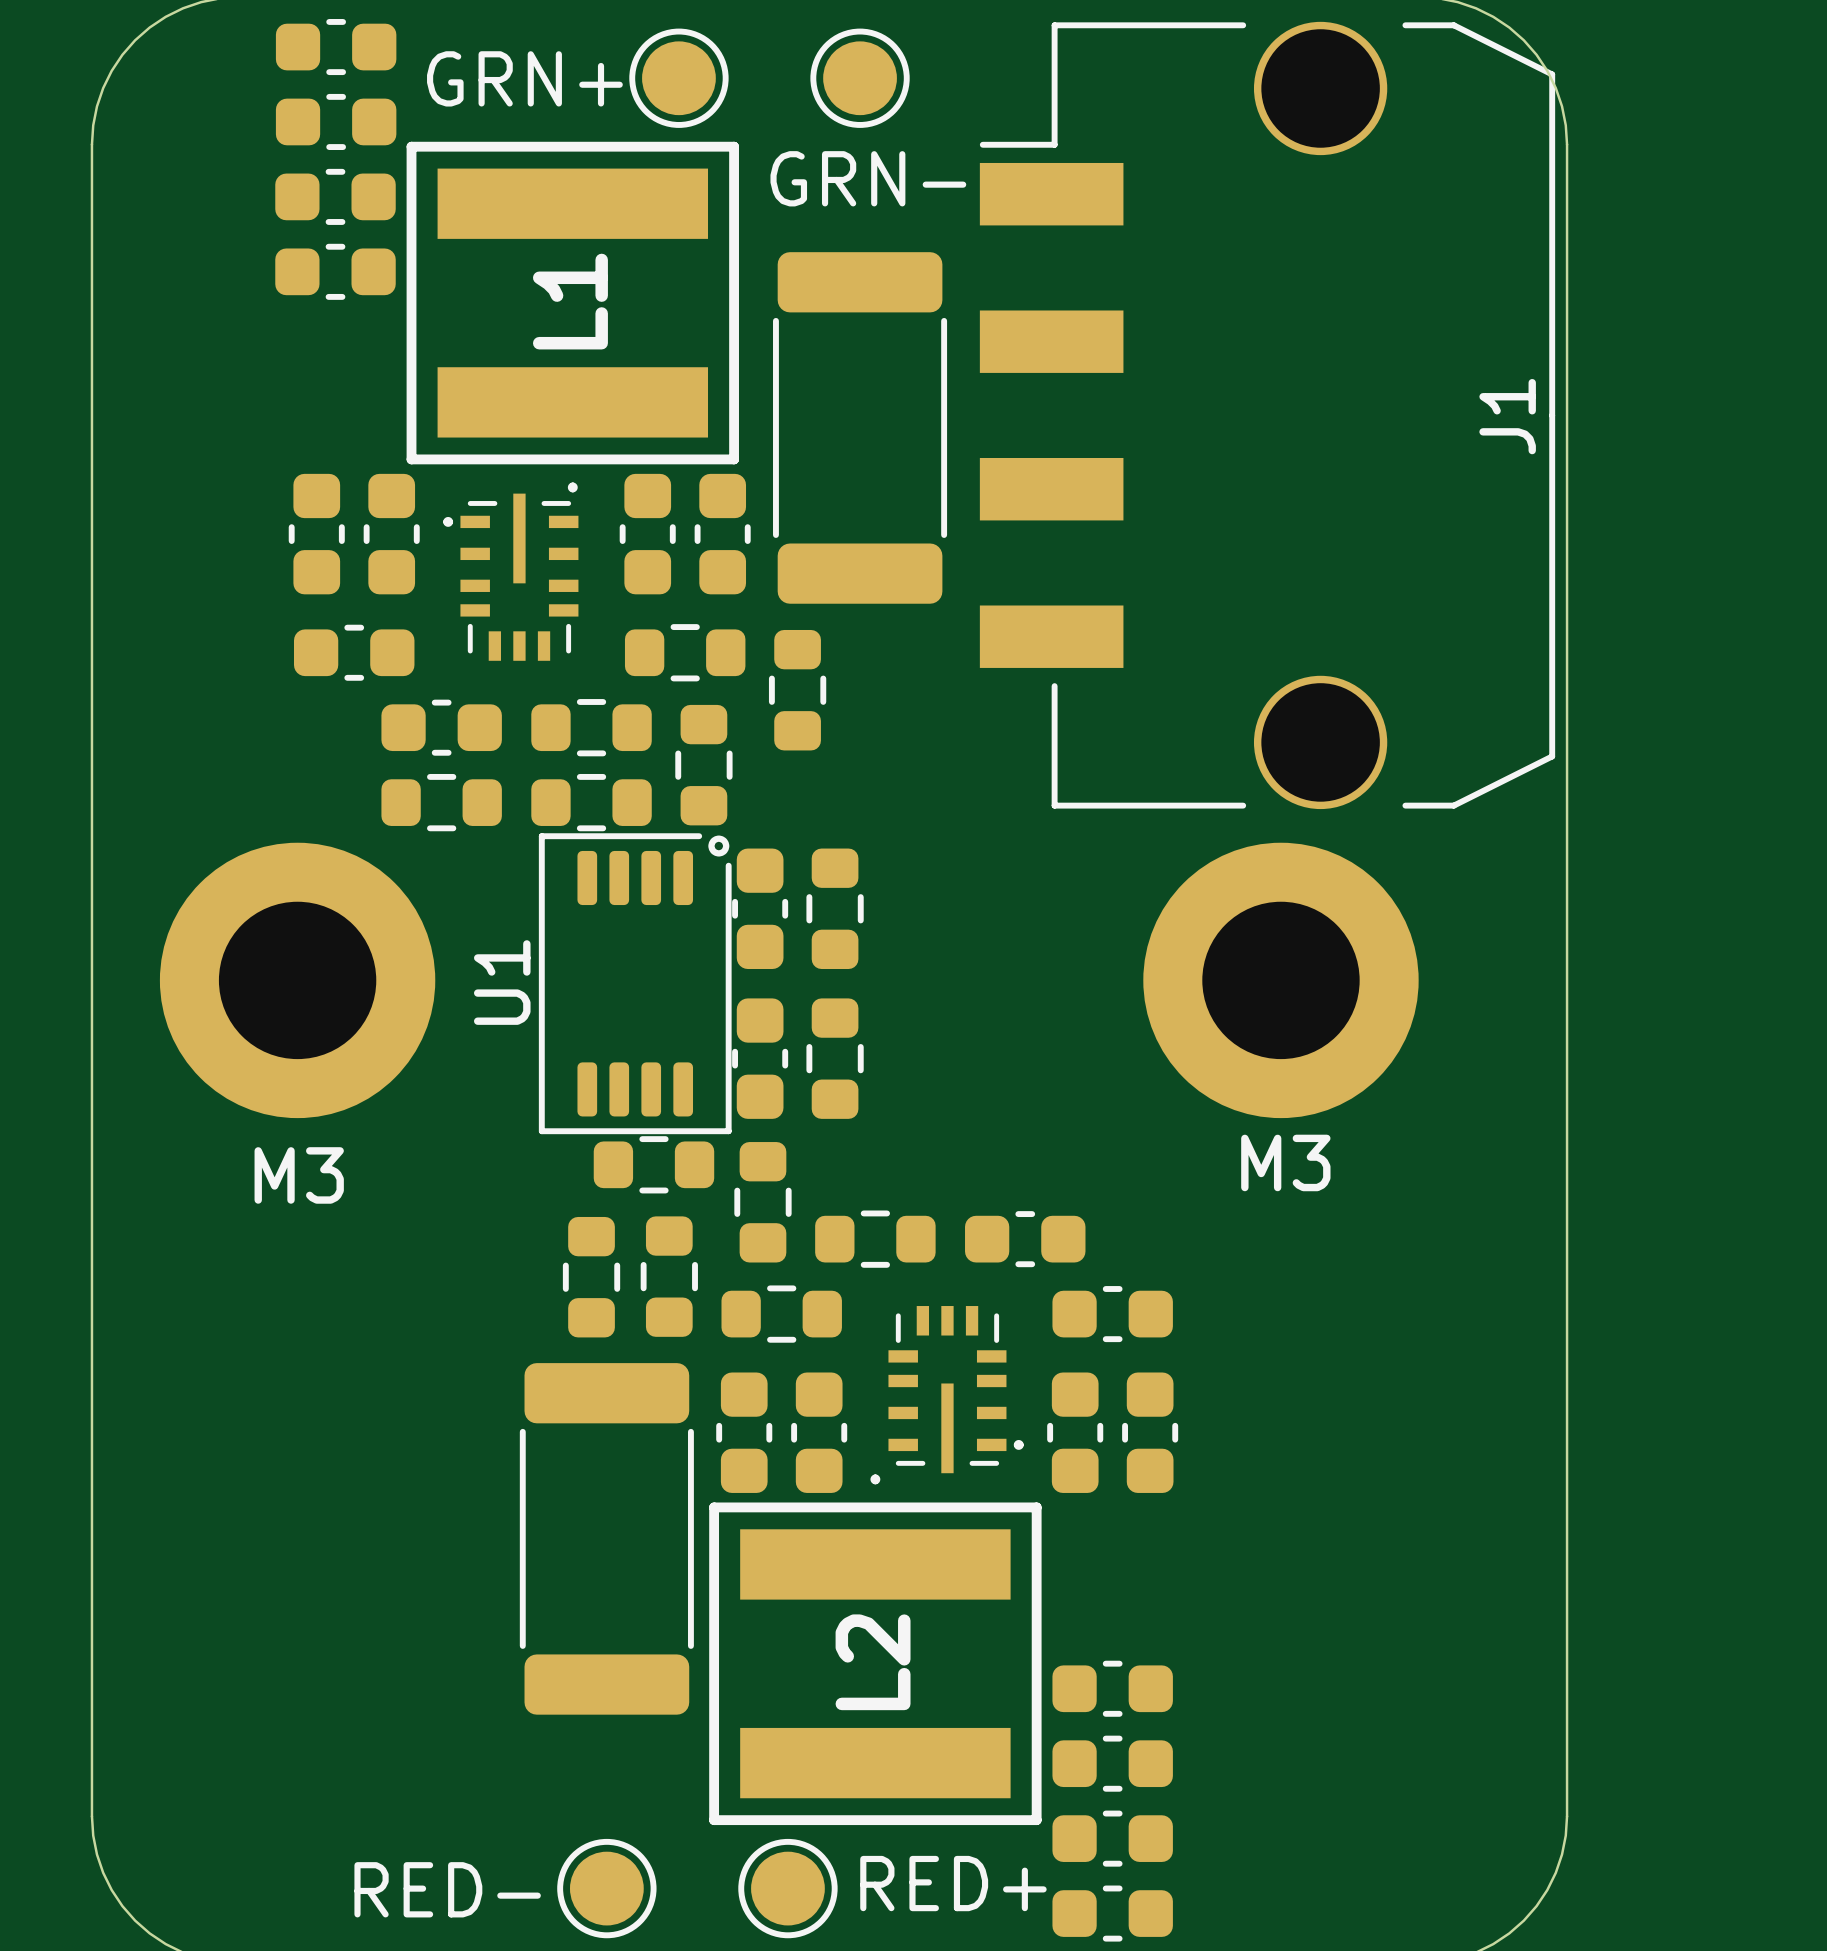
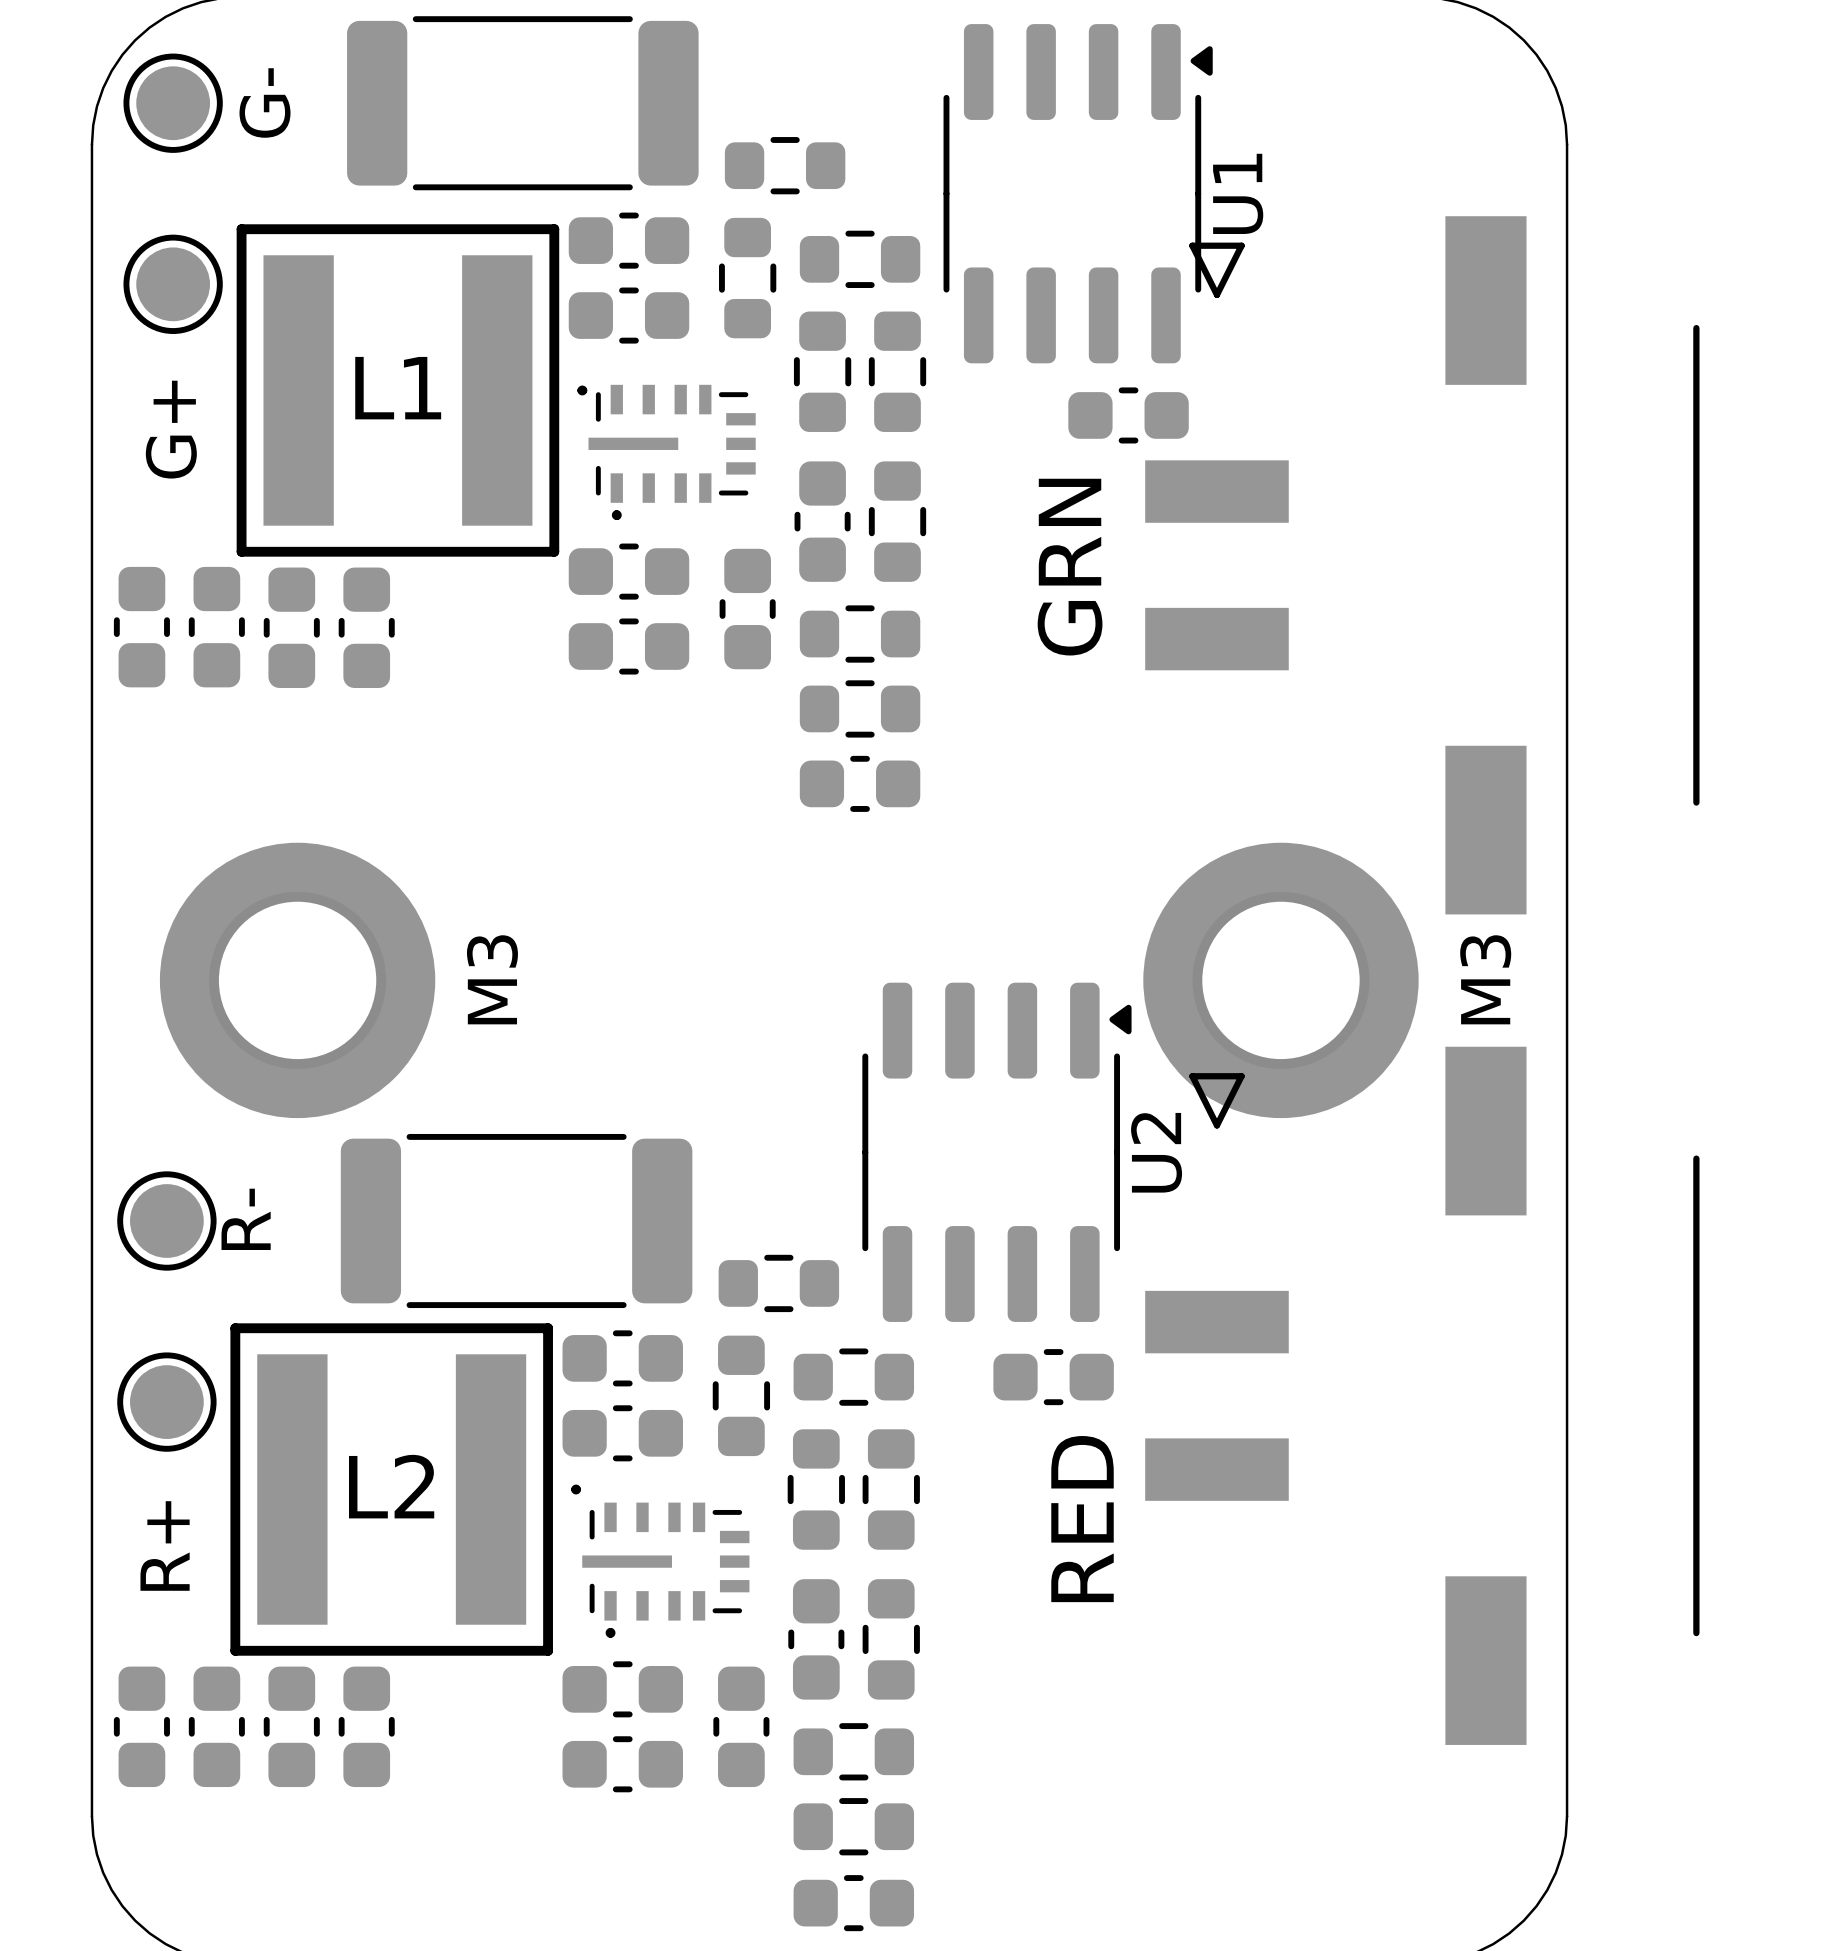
part: (336, 47) -> none
text: GRN+ (524, 78) -> none
part: (678, 78) -> none
part: (860, 78) -> none
G-: none -> (173, 103)
part: none -> (522, 103)
part: (336, 121) -> none
part: none -> (785, 165)
text: GRN- (868, 178) -> none
part: (335, 196) -> none
part: none -> (628, 240)
part: none -> (860, 259)
part: (335, 271) -> none
part: none -> (747, 278)
G+: none -> (173, 284)
part: none -> (628, 315)
L1 rotation: 0° (572, 317) -> 90° counterclockwise (411, 390)
part: none -> (822, 371)
part: none -> (897, 371)
part: none -> (1128, 415)
J1: (1267, 415) -> none
part: (860, 427) -> none
part: none -> (822, 521)
part: none -> (897, 521)
part: (316, 534) -> none
part: (391, 534) -> none
part rotation: 0° (647, 534) -> 90° clockwise (628, 571)
part: (722, 534) -> none
GRN: none -> (1422, 565)
part rotation: 0° (510, 577) -> 90° counterclockwise (672, 452)
part position: (510, 577) -> (672, 452)
part: none -> (747, 609)
part: none -> (141, 627)
part: none -> (216, 627)
part: none -> (291, 627)
part: none -> (860, 634)
part: none -> (628, 646)
part rotation: 0° (354, 652) -> 90° clockwise (366, 627)
part: (685, 652) -> none
part: (797, 690) -> none
part: none -> (860, 708)
part: (441, 727) -> none
part: (591, 727) -> none
part: (703, 765) -> none
part: none -> (860, 783)
part: (441, 802) -> none
part: (591, 802) -> none
U1 footprint: [538, 833, 732, 1135] -> [943, 24, 1213, 364]
part: (760, 908) -> none
part: (835, 908) -> none
U1 name position: U1 (502, 982) -> U1 (1238, 193)
part: (760, 1058) -> none
part: (835, 1058) -> none
U2: none -> (996, 1152)
M3 name rotation: 0° (1285, 1162) -> 90° counterclockwise (1485, 979)
M3 name position: M3 (1285, 1162) -> M3 (1485, 979)
part: (653, 1164) -> none
M3 name rotation: 0° (299, 1175) -> 90° counterclockwise (492, 979)
M3 name position: M3 (299, 1175) -> M3 (492, 979)
part: (762, 1202) -> none
R-: none -> (166, 1221)
part: (875, 1239) -> none
part: (1025, 1239) -> none
part: (669, 1276) -> none
part: (591, 1277) -> none
part position: (781, 1314) -> (778, 1283)
part: (1112, 1314) -> none
part: none -> (622, 1358)
part footprint: [716, 1372, 773, 1493] -> [712, 1335, 771, 1457]
part: none -> (853, 1377)
part: none -> (1053, 1377)
part rotation: 0° (956, 1389) -> 90° clockwise (665, 1570)
part position: (956, 1389) -> (665, 1570)
RED: none -> (1422, 1395)
R+: none -> (166, 1402)
part: (819, 1432) -> none
part: (1075, 1432) -> none
part: (1150, 1432) -> none
part: none -> (622, 1433)
part: none -> (816, 1489)
part: none -> (891, 1489)
part rotation: 0° (606, 1538) -> 90° clockwise (516, 1221)
part position: (606, 1538) -> (516, 1221)
part: none -> (816, 1639)
part: none -> (891, 1639)
L2 rotation: 0° (875, 1649) -> 90° clockwise (405, 1489)
L2 position: (875, 1649) -> (405, 1489)
part: (1112, 1688) -> none
part: none -> (622, 1689)
part: none -> (141, 1726)
part: none -> (216, 1726)
part: none -> (291, 1726)
part: none -> (366, 1726)
part: none -> (741, 1726)
part: none -> (853, 1751)
part: (1112, 1763) -> none
part: none -> (622, 1764)
part: none -> (853, 1826)
part: (1112, 1838) -> none
text: RED+ (953, 1883) -> none
part: (606, 1888) -> none
part: (787, 1888) -> none
text: RED- (447, 1889) -> none
part: none -> (853, 1903)
part: (1112, 1913) -> none

